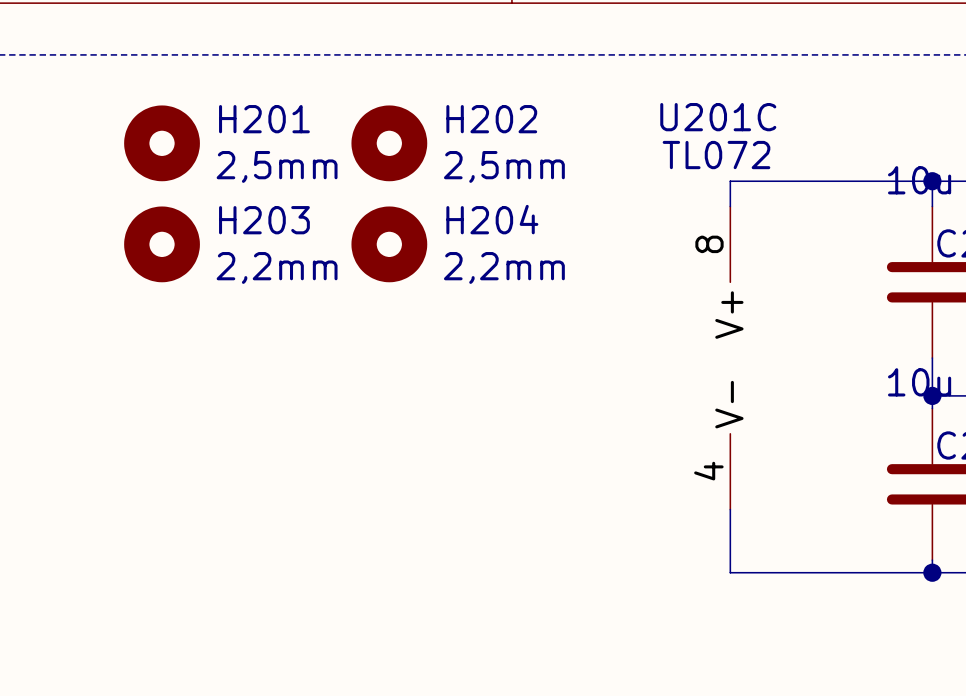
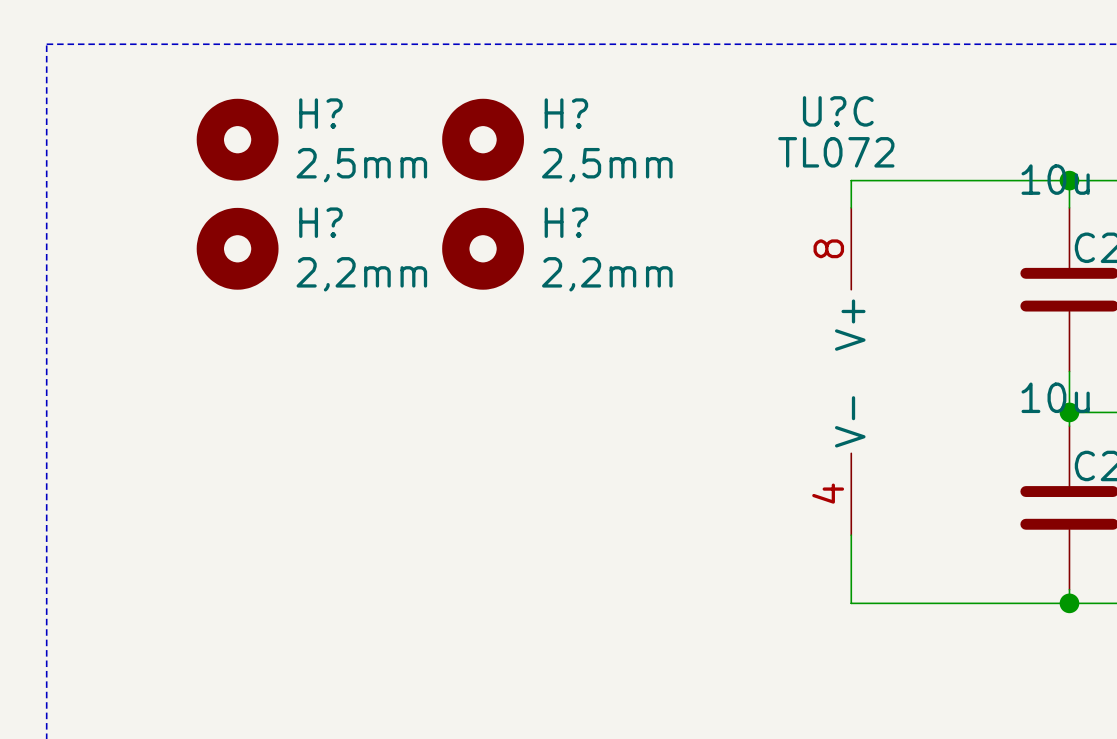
U201C name: U201C (718, 117) -> U?C (838, 111)
H201 name: H201 (264, 119) -> H? (320, 113)
H202 name: H202 (491, 119) -> H? (566, 113)
H204 name: H204 (492, 219) -> H? (566, 222)
H203 name: H203 (264, 220) -> H? (320, 222)

